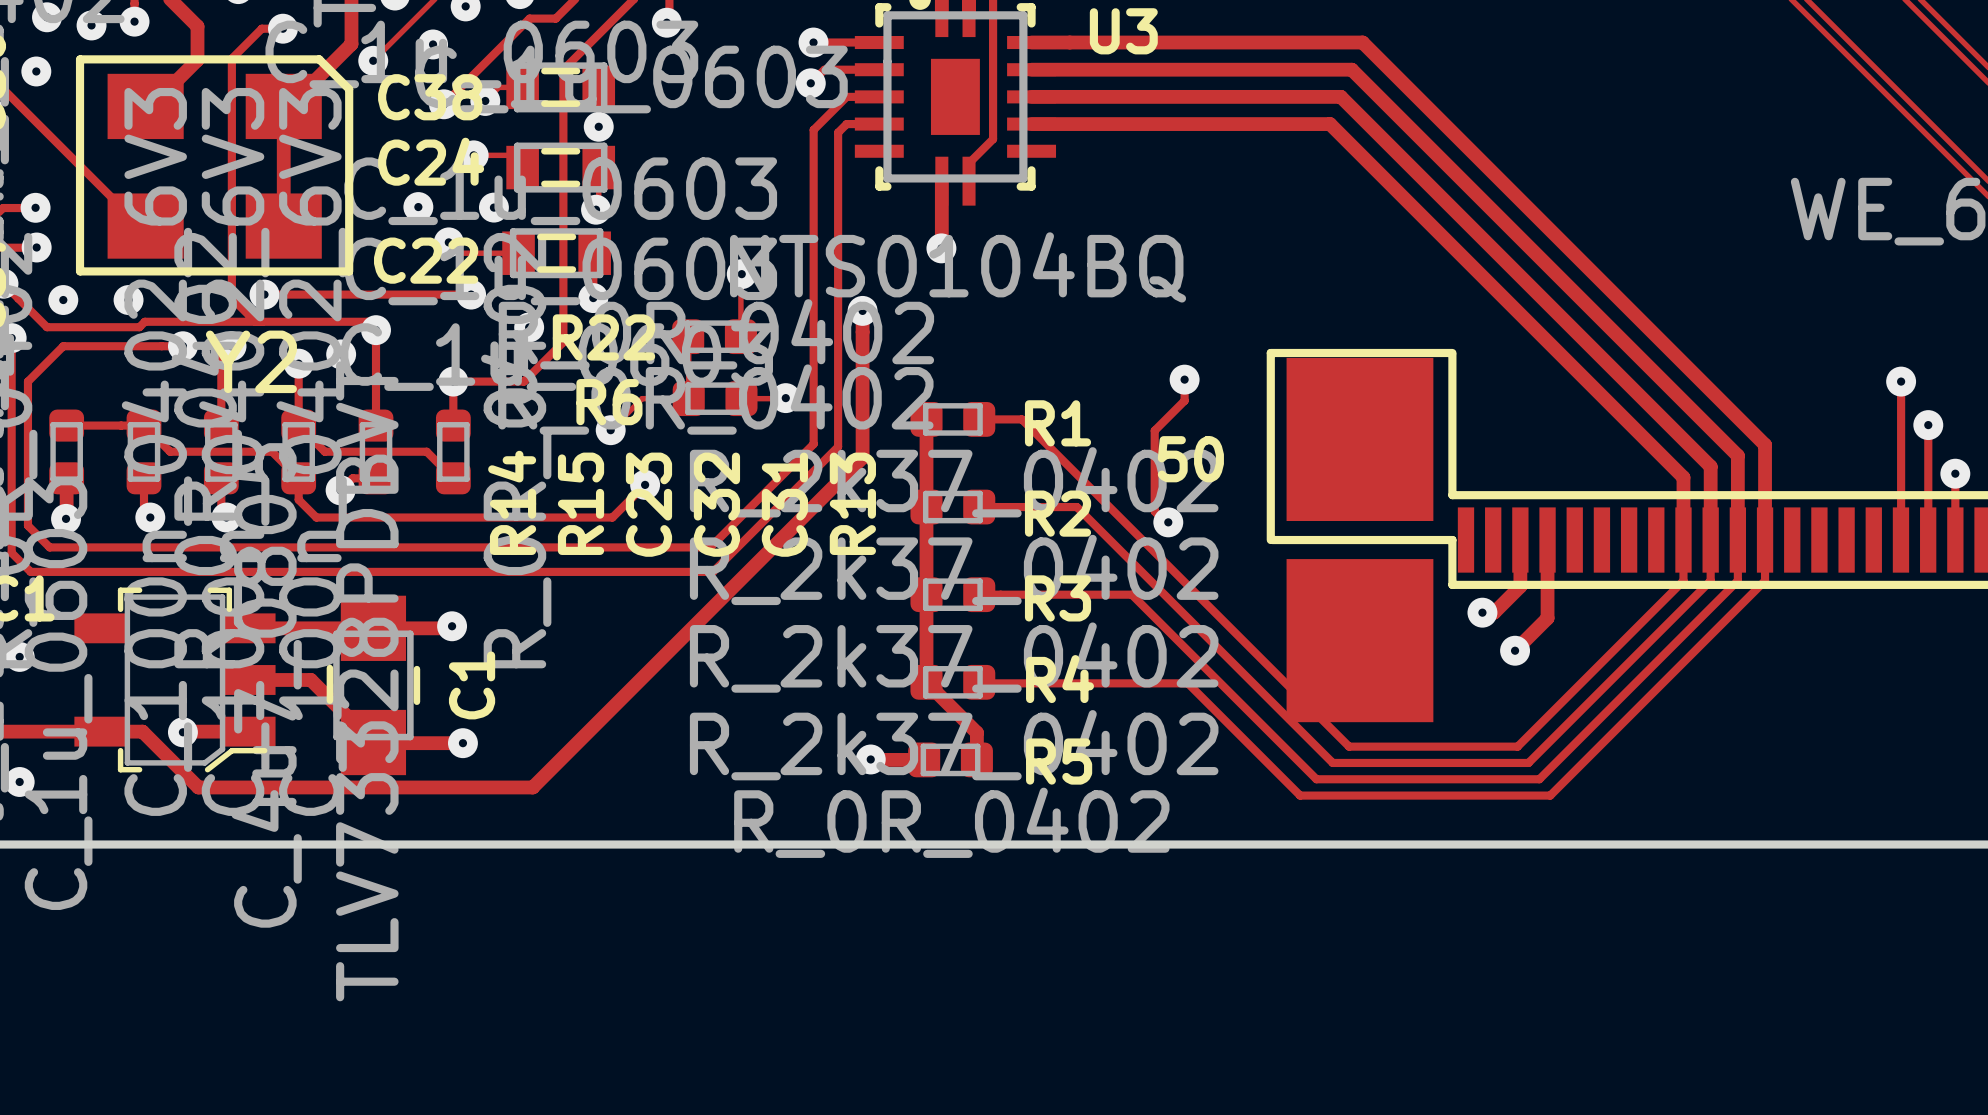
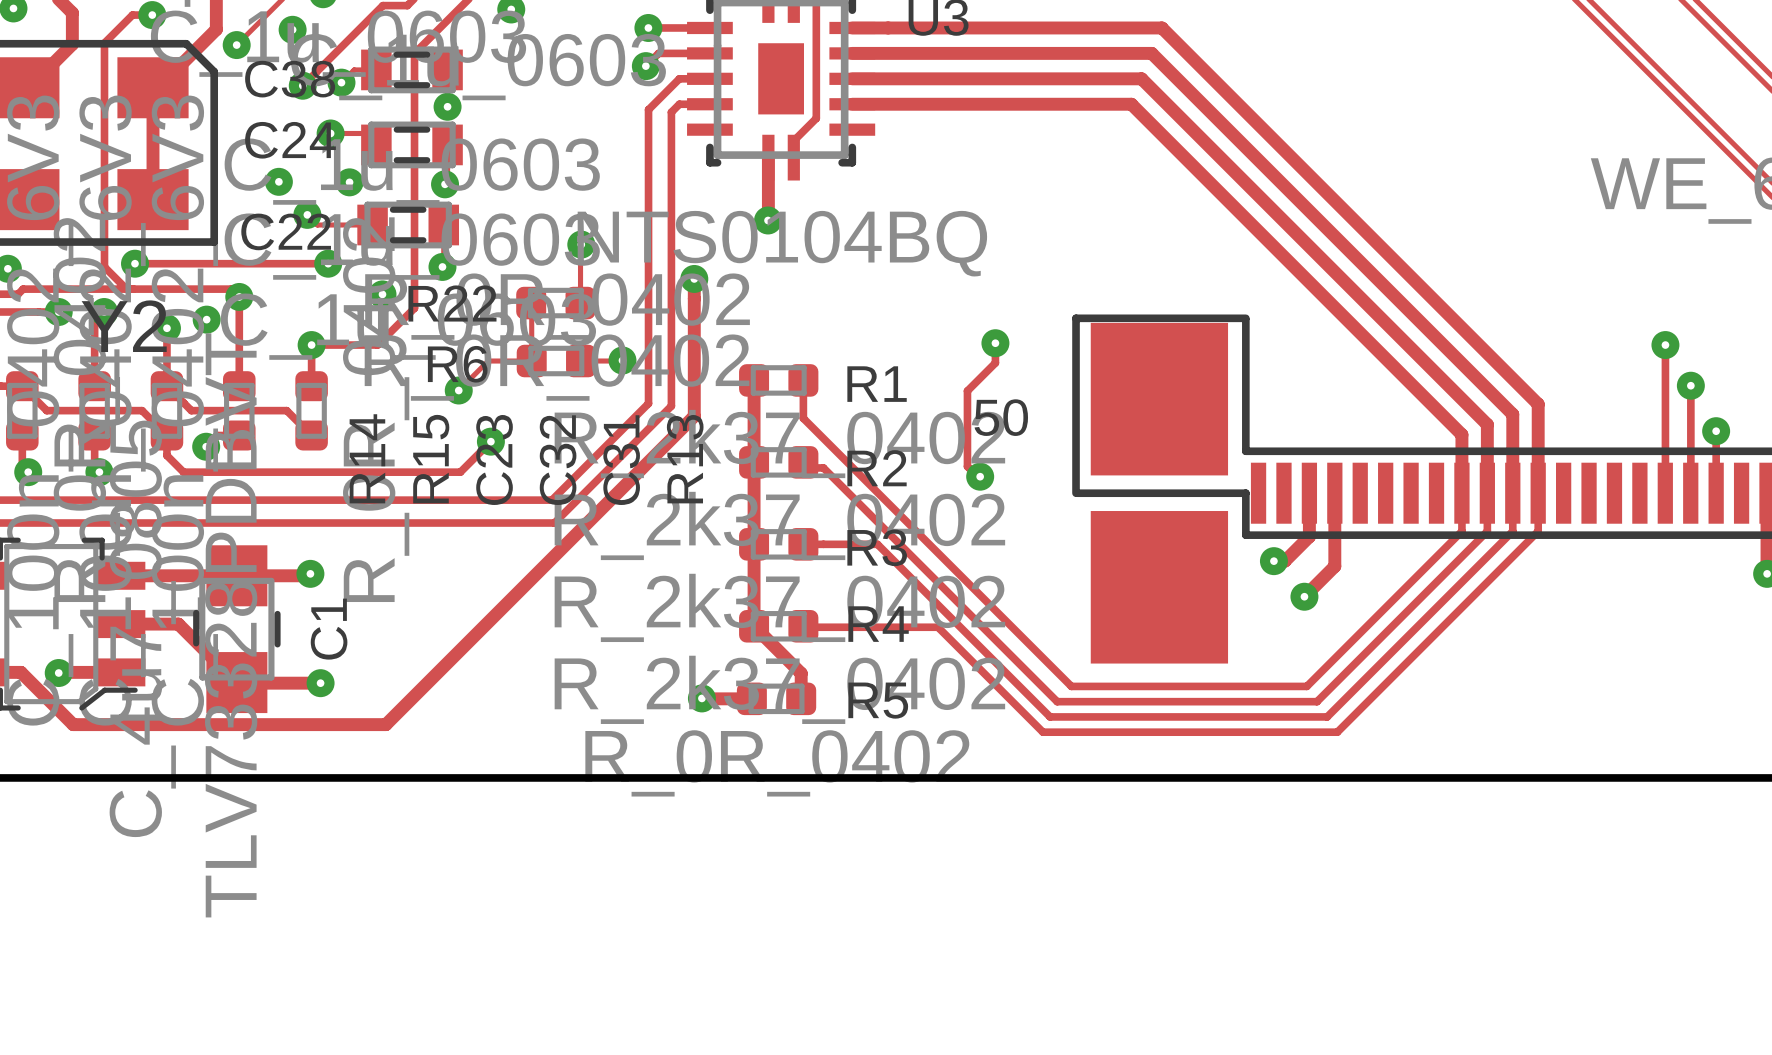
track: (979, 419) (1021, 419) (1349, 746) -> (803, 380) (803, 418) (1071, 686) (1149, 686)
track: (979, 507) (1076, 507) (1332, 762) -> (803, 462) (808, 467) (823, 467) (1057, 701) (1133, 701)
track: (1058, 594) (1131, 594) (1316, 779) -> (877, 544) (1050, 716) (1118, 716)
track: (1123, 683) (1187, 683) (1300, 795) -> (938, 627) (1042, 732) (1103, 732)

